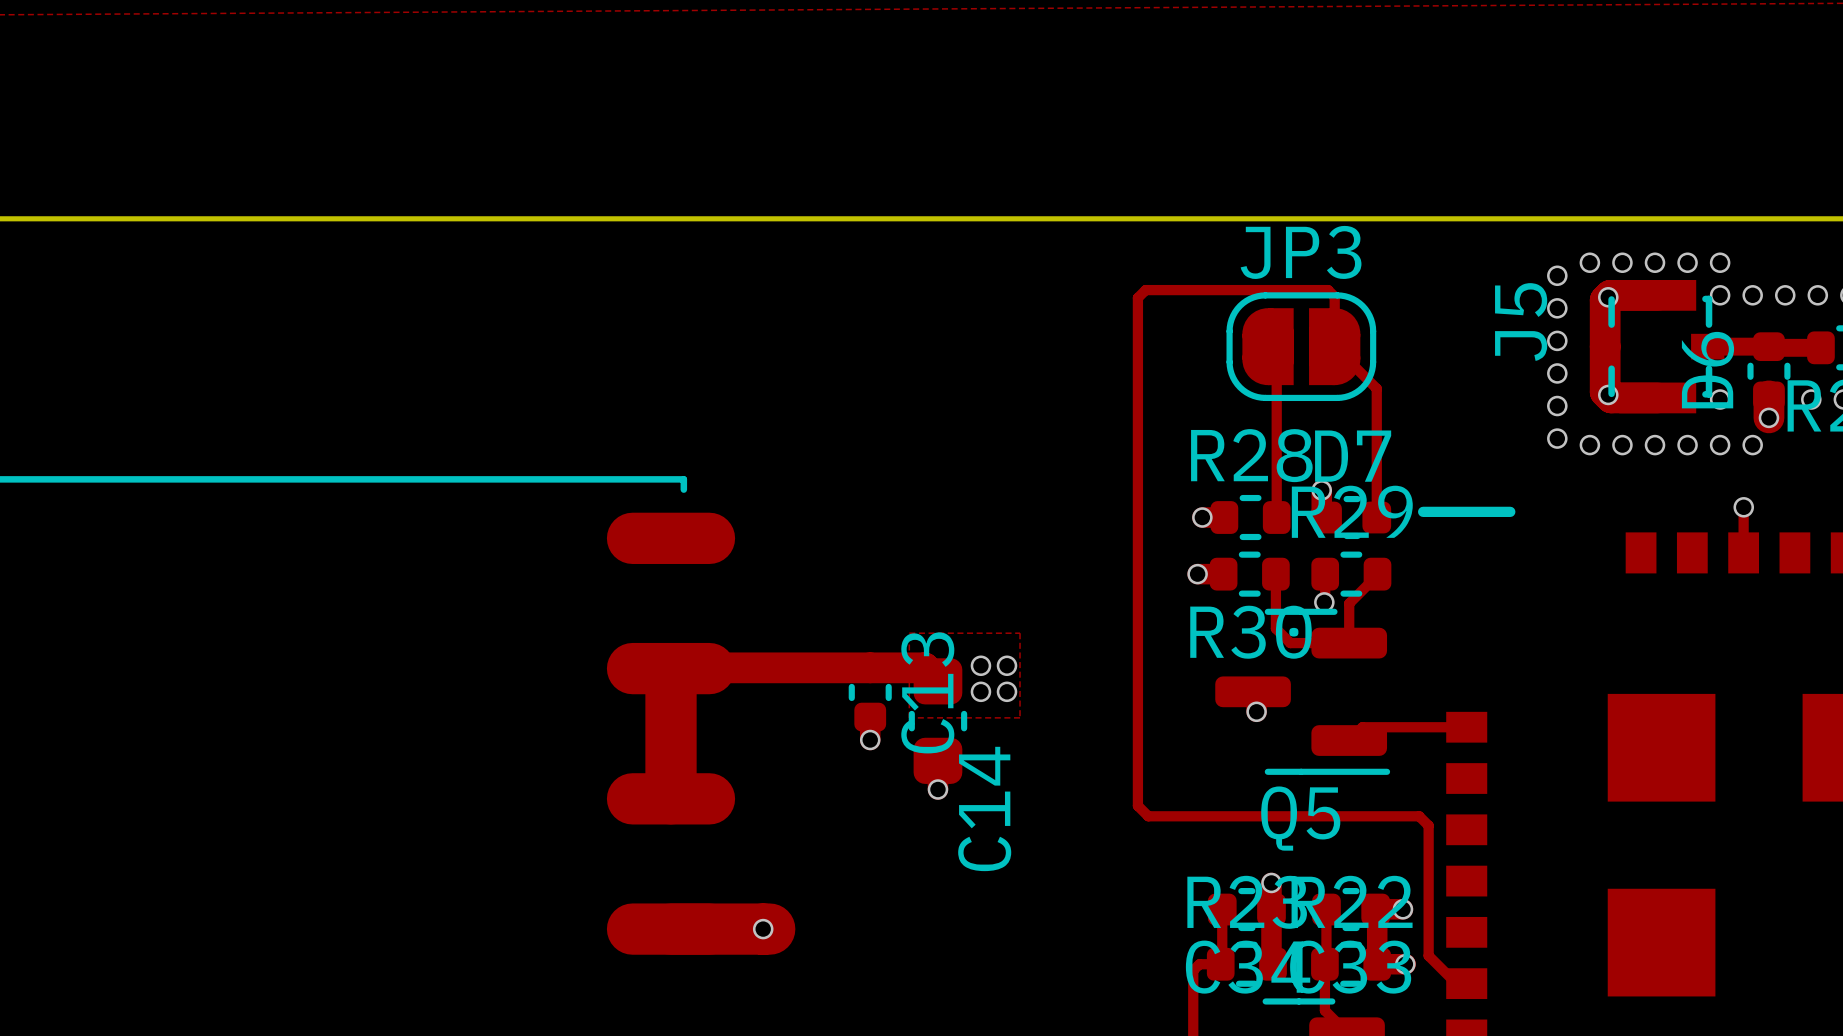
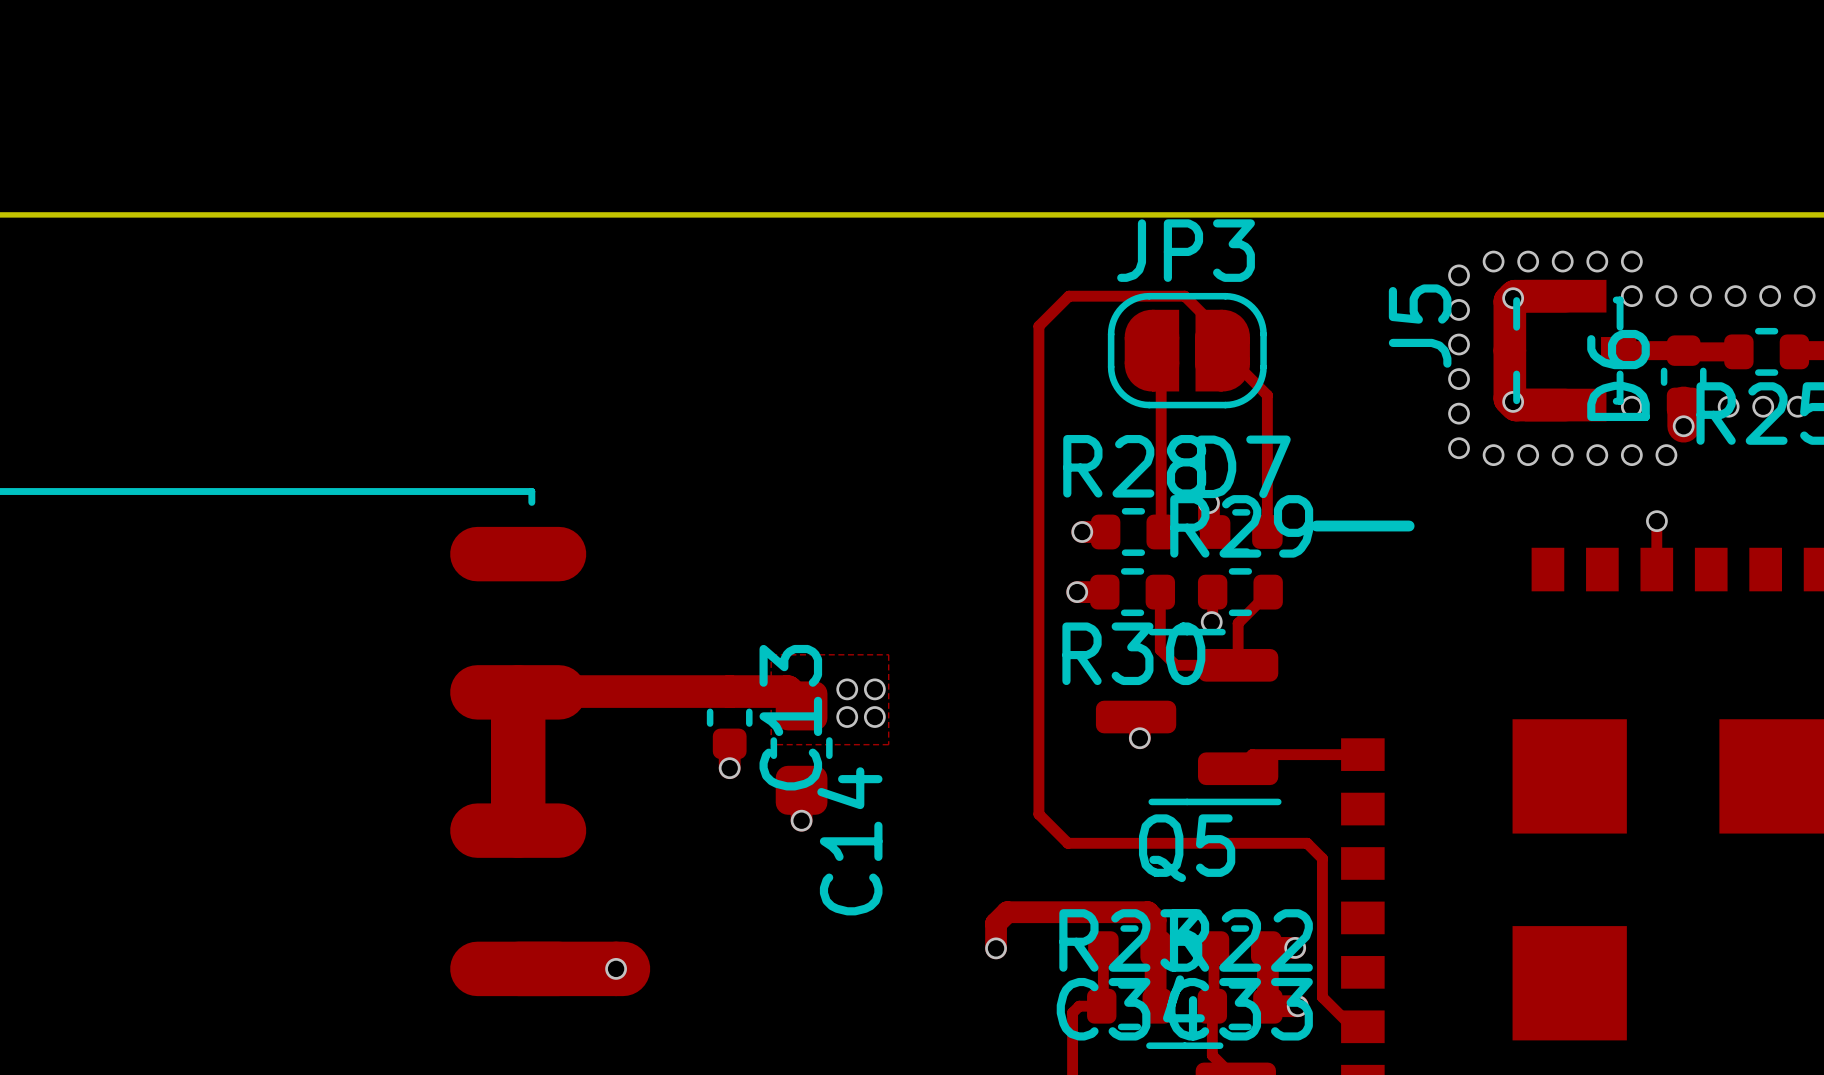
track: (1334, 331) (1334, 296) (1328, 290) (1145, 290) (1137, 297) (1137, 805) (1148, 816) (1419, 816) (1428, 825) -> (1222, 334) (1184, 296) (1068, 296) (1038, 326) (1038, 814) (1067, 843) (1307, 843) (1322, 858)
track: none -> (1155, 919) (1147, 912) (1007, 912) (996, 923) (996, 948)
via position: (1271, 882) -> (996, 948)

